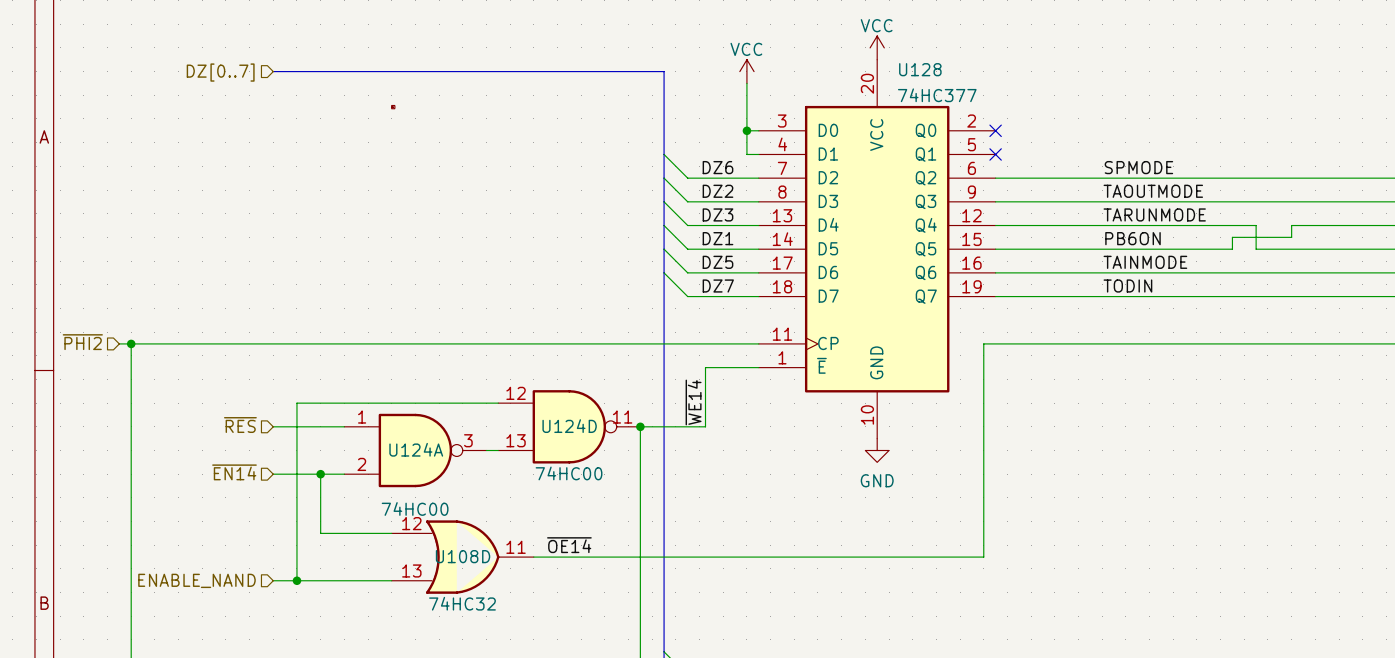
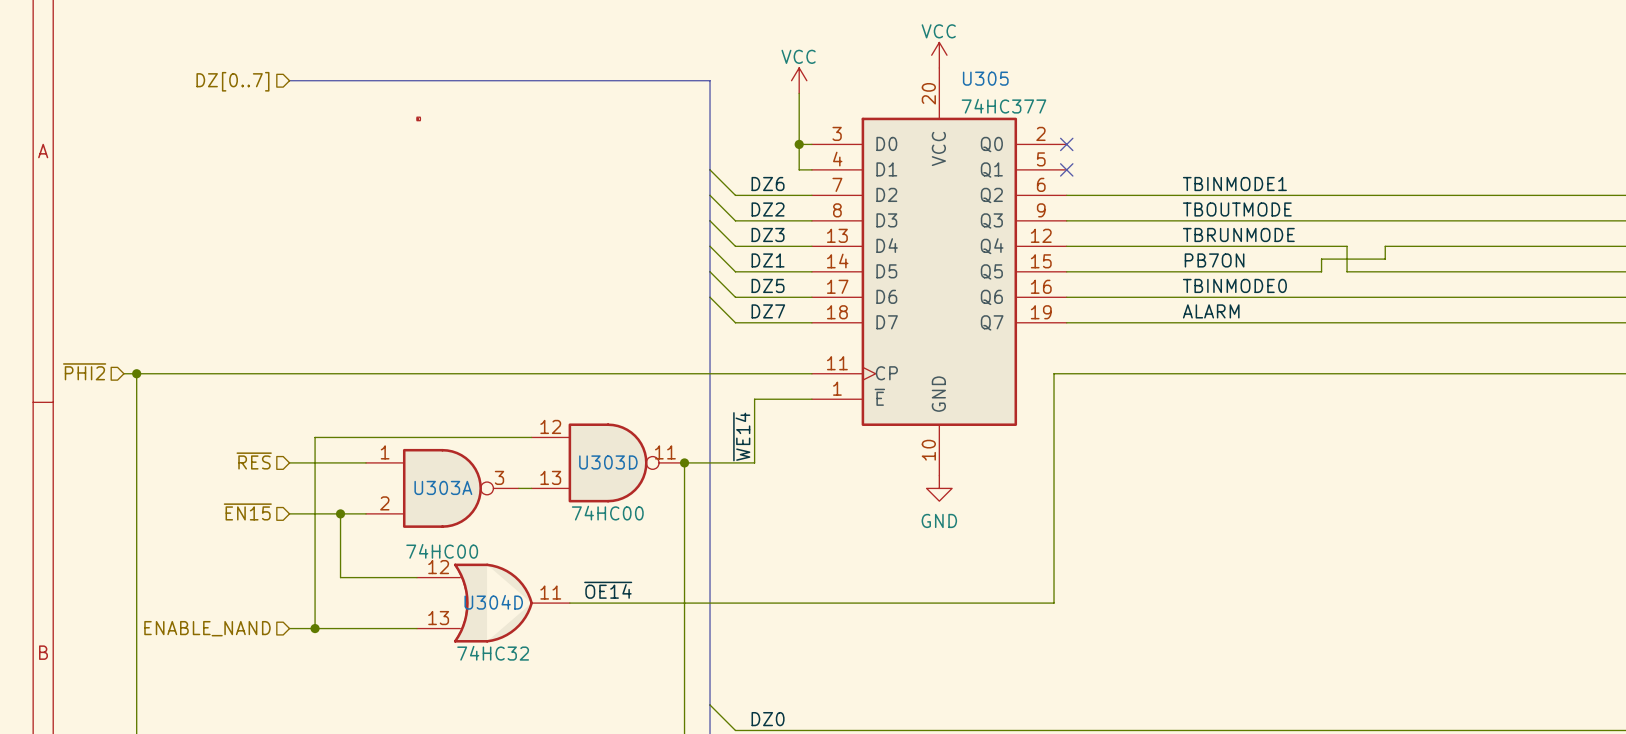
U128 name: U128 (920, 69) -> U305 (985, 78)
label: SPMODE (1138, 167) -> TBINMODE1 (1234, 184)
label: TAOUTMODE (1153, 191) -> TBOUTMODE (1237, 209)
label: TARUNMODE (1154, 214) -> TBRUNMODE (1238, 234)
label: PB6ON (1133, 238) -> PB7ON (1214, 260)
label: TAINMODE (1145, 262) -> TBINMODE0 (1234, 285)
label: TODIN (1127, 286) -> ALARM (1211, 311)
U124D name: U124D (569, 426) -> U303D (608, 462)
U124A name: U124A (416, 449) -> U303A (443, 487)
hierarchical label: ~{EN14} (234, 472) -> ~{EN15} (247, 511)
U108D name: U108D (463, 556) -> U304D (493, 602)

